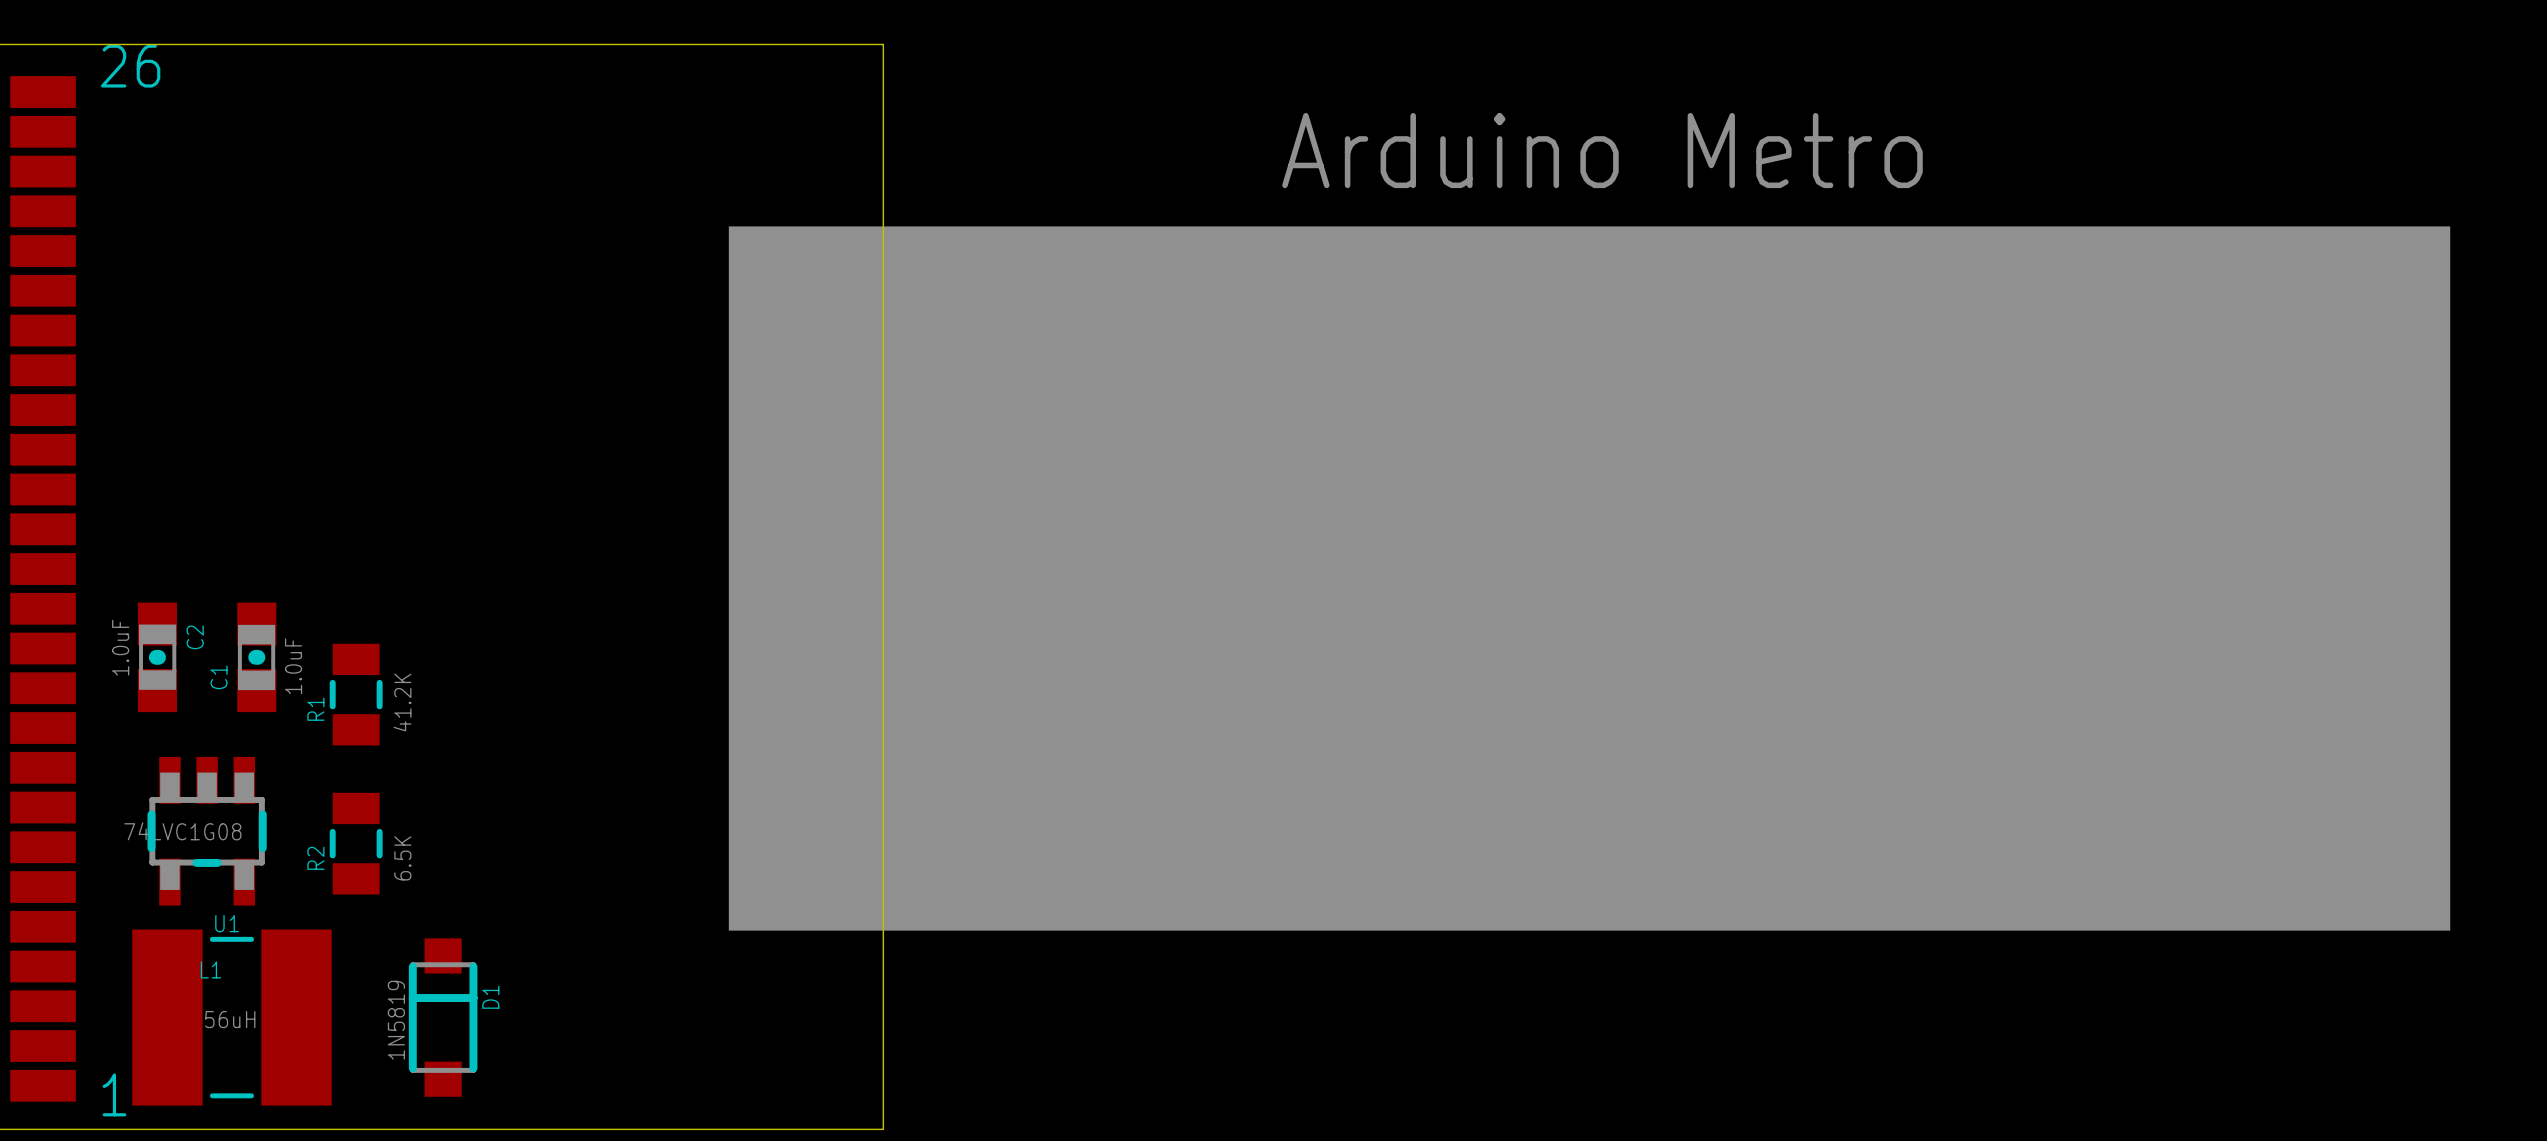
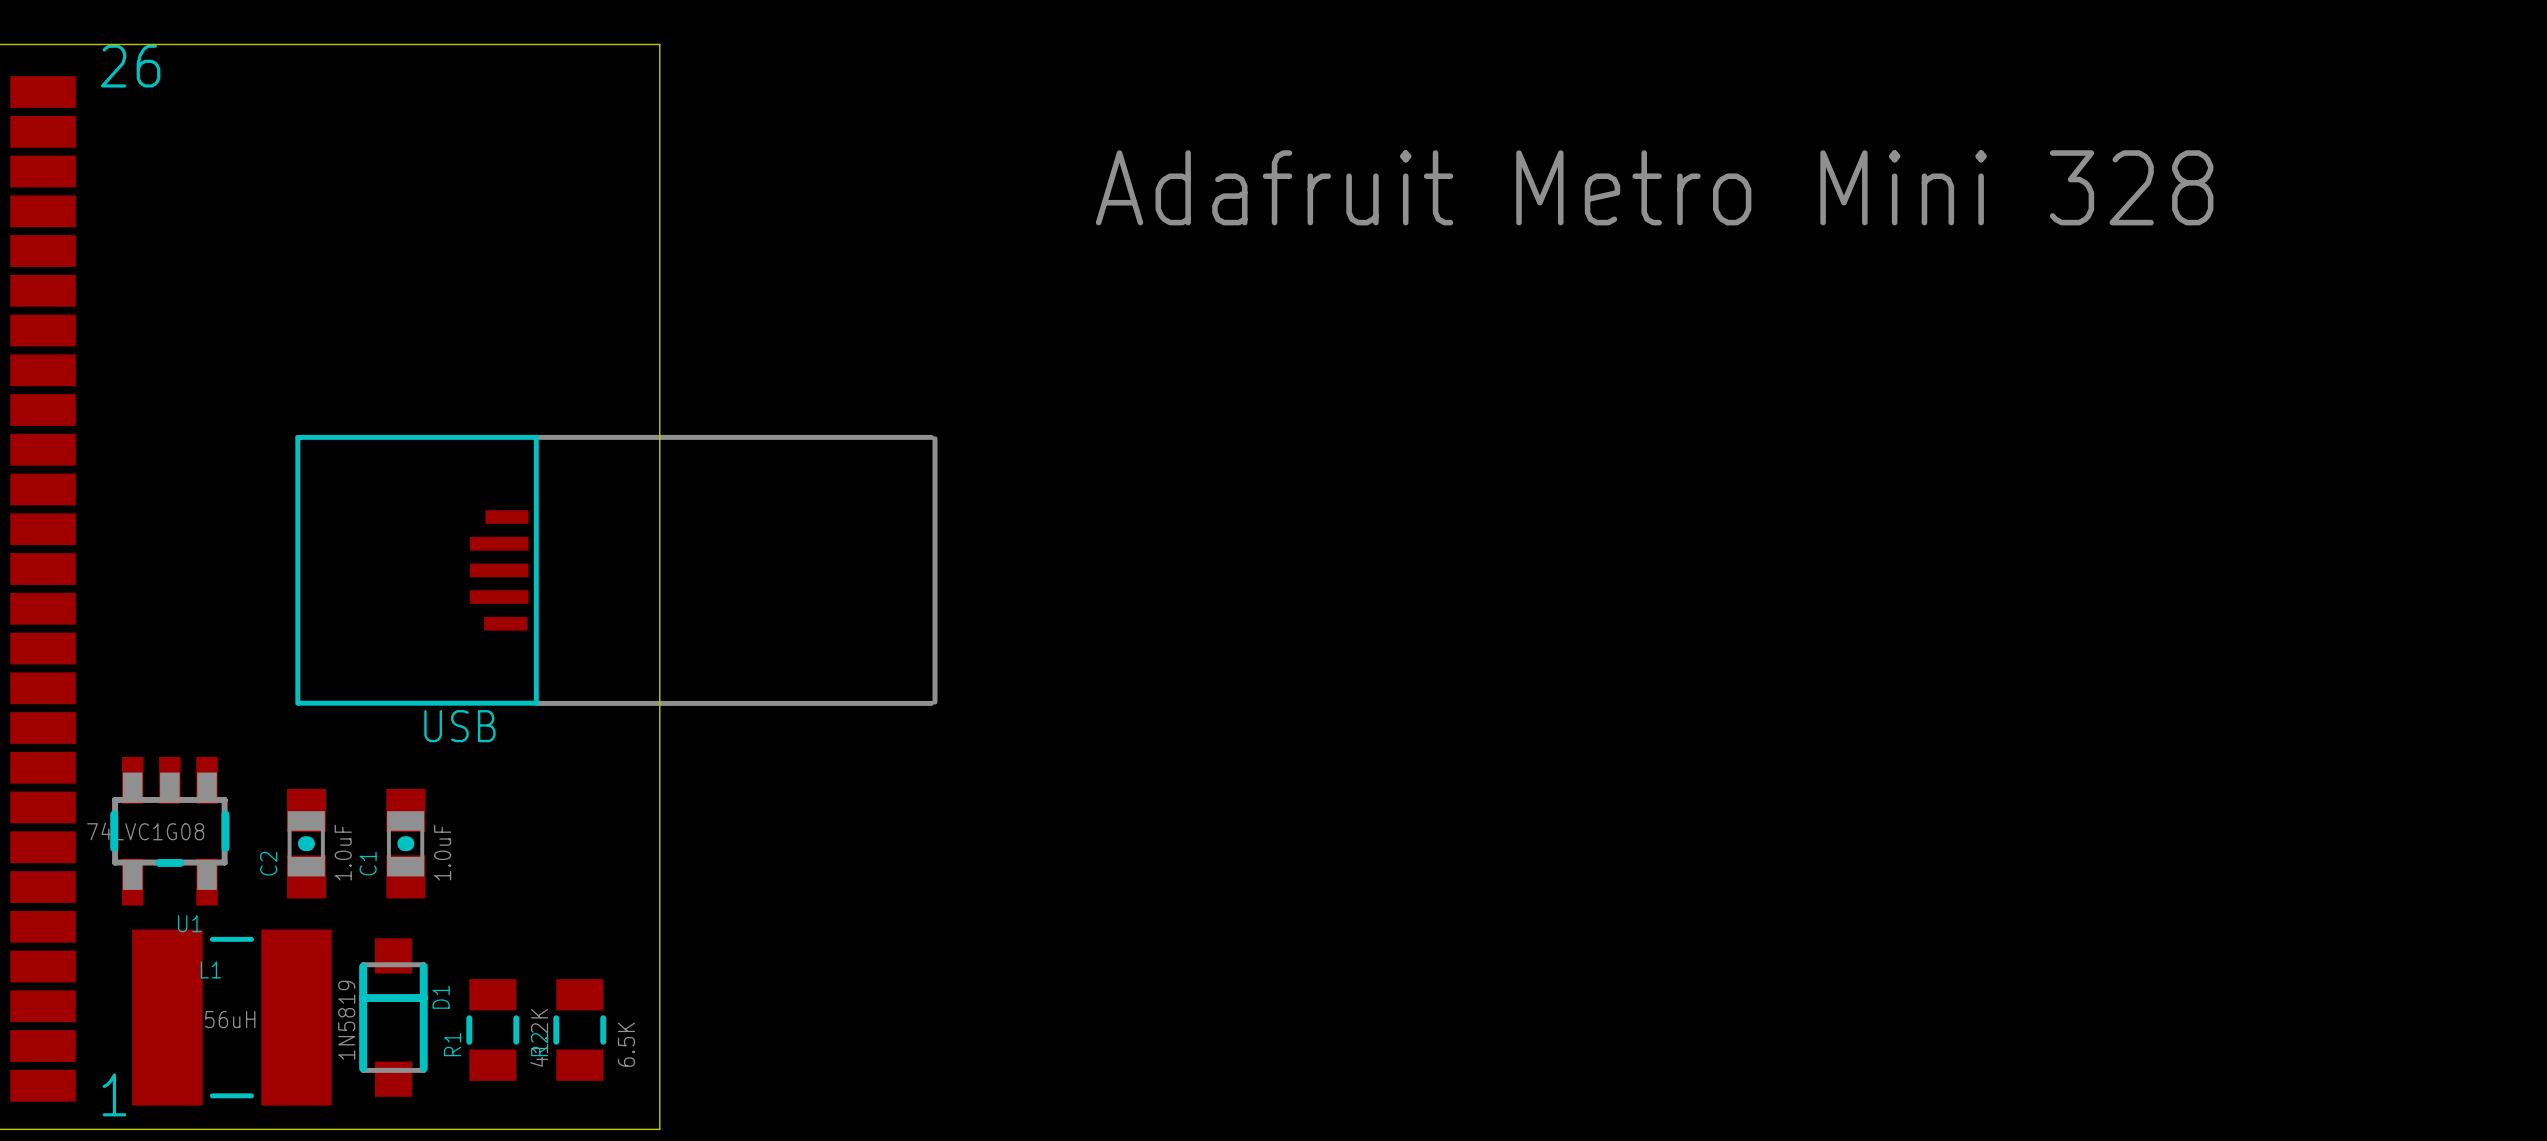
board edge: (659, 44) (883, 44) (883, 1129) (659, 1129) -> (659, 44) (659, 1129)
text: Arduino Metro (1602, 150) -> none
text: none -> Adafruit Metro Mini 328 (1654, 187)
drawing: [728, 226, 2451, 931] -> none
USB: none -> (616, 570)
C2 name position: C2 (195, 637) -> C2 (268, 863)
C2 value position: 1.0uF (120, 647) -> 1.0uF (343, 852)
C2 position: (157, 657) -> (306, 843)
C1 position: (256, 657) -> (405, 843)
R1 position: (356, 694) -> (492, 1030)
U1 position: (207, 831) -> (169, 831)
R2 position: (356, 843) -> (579, 1030)
D1 position: (443, 1017) -> (393, 1017)

